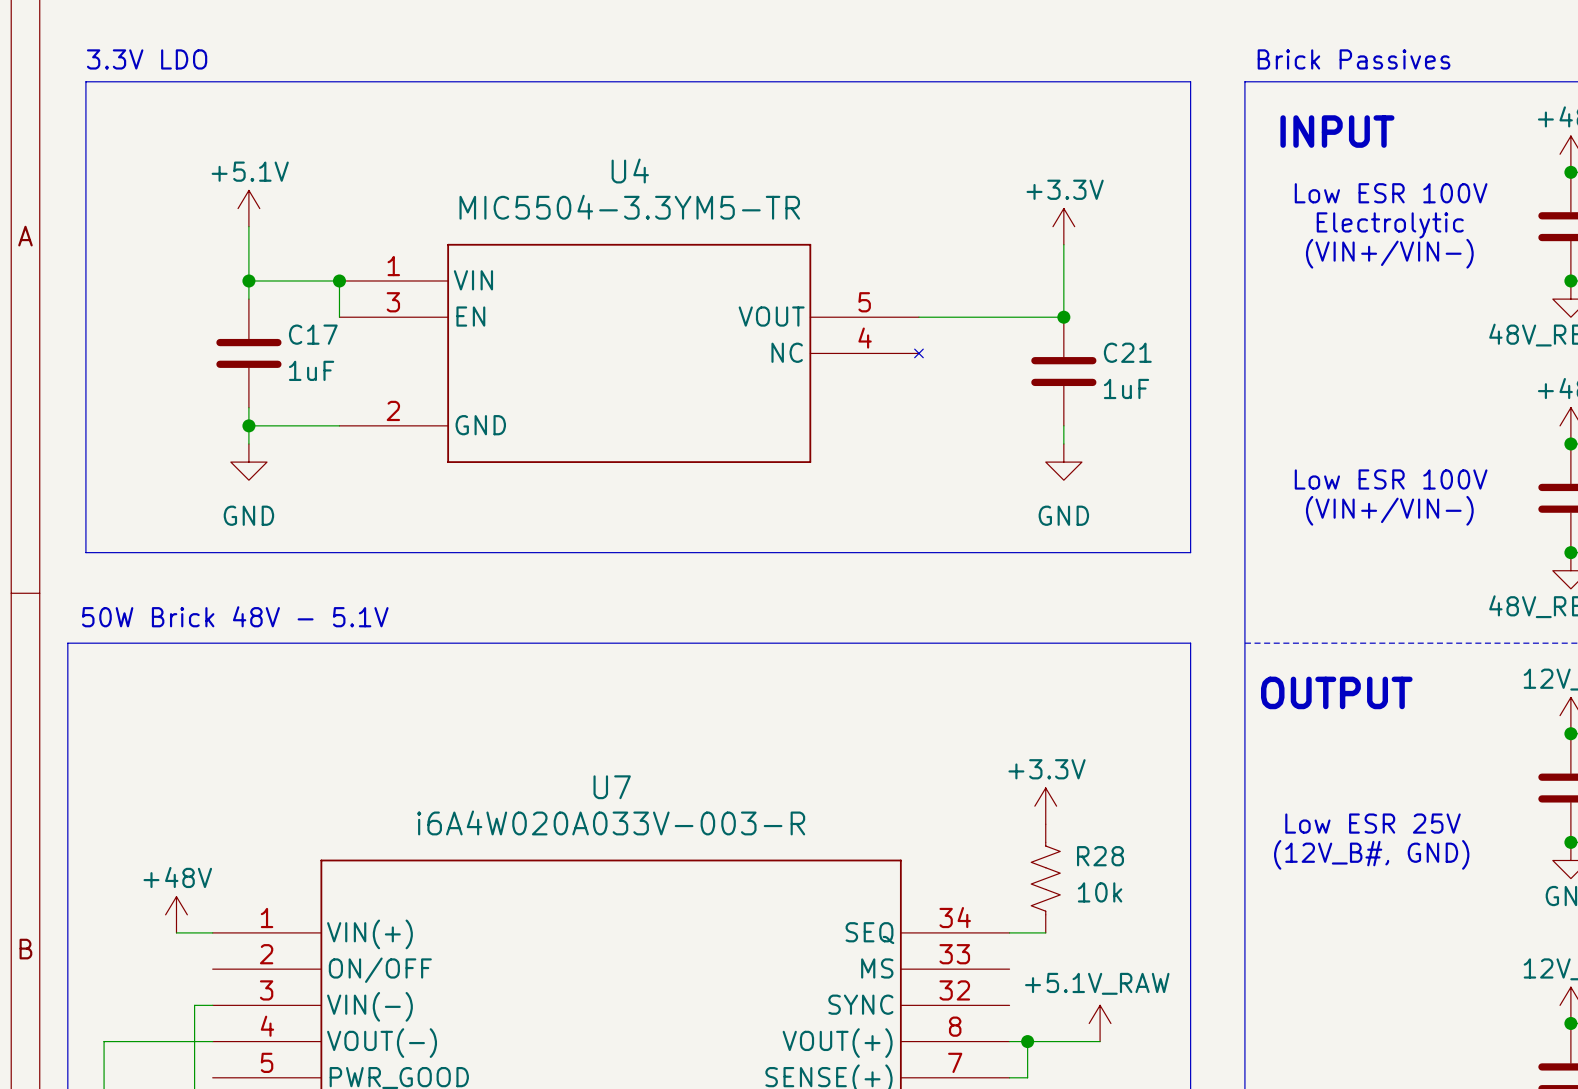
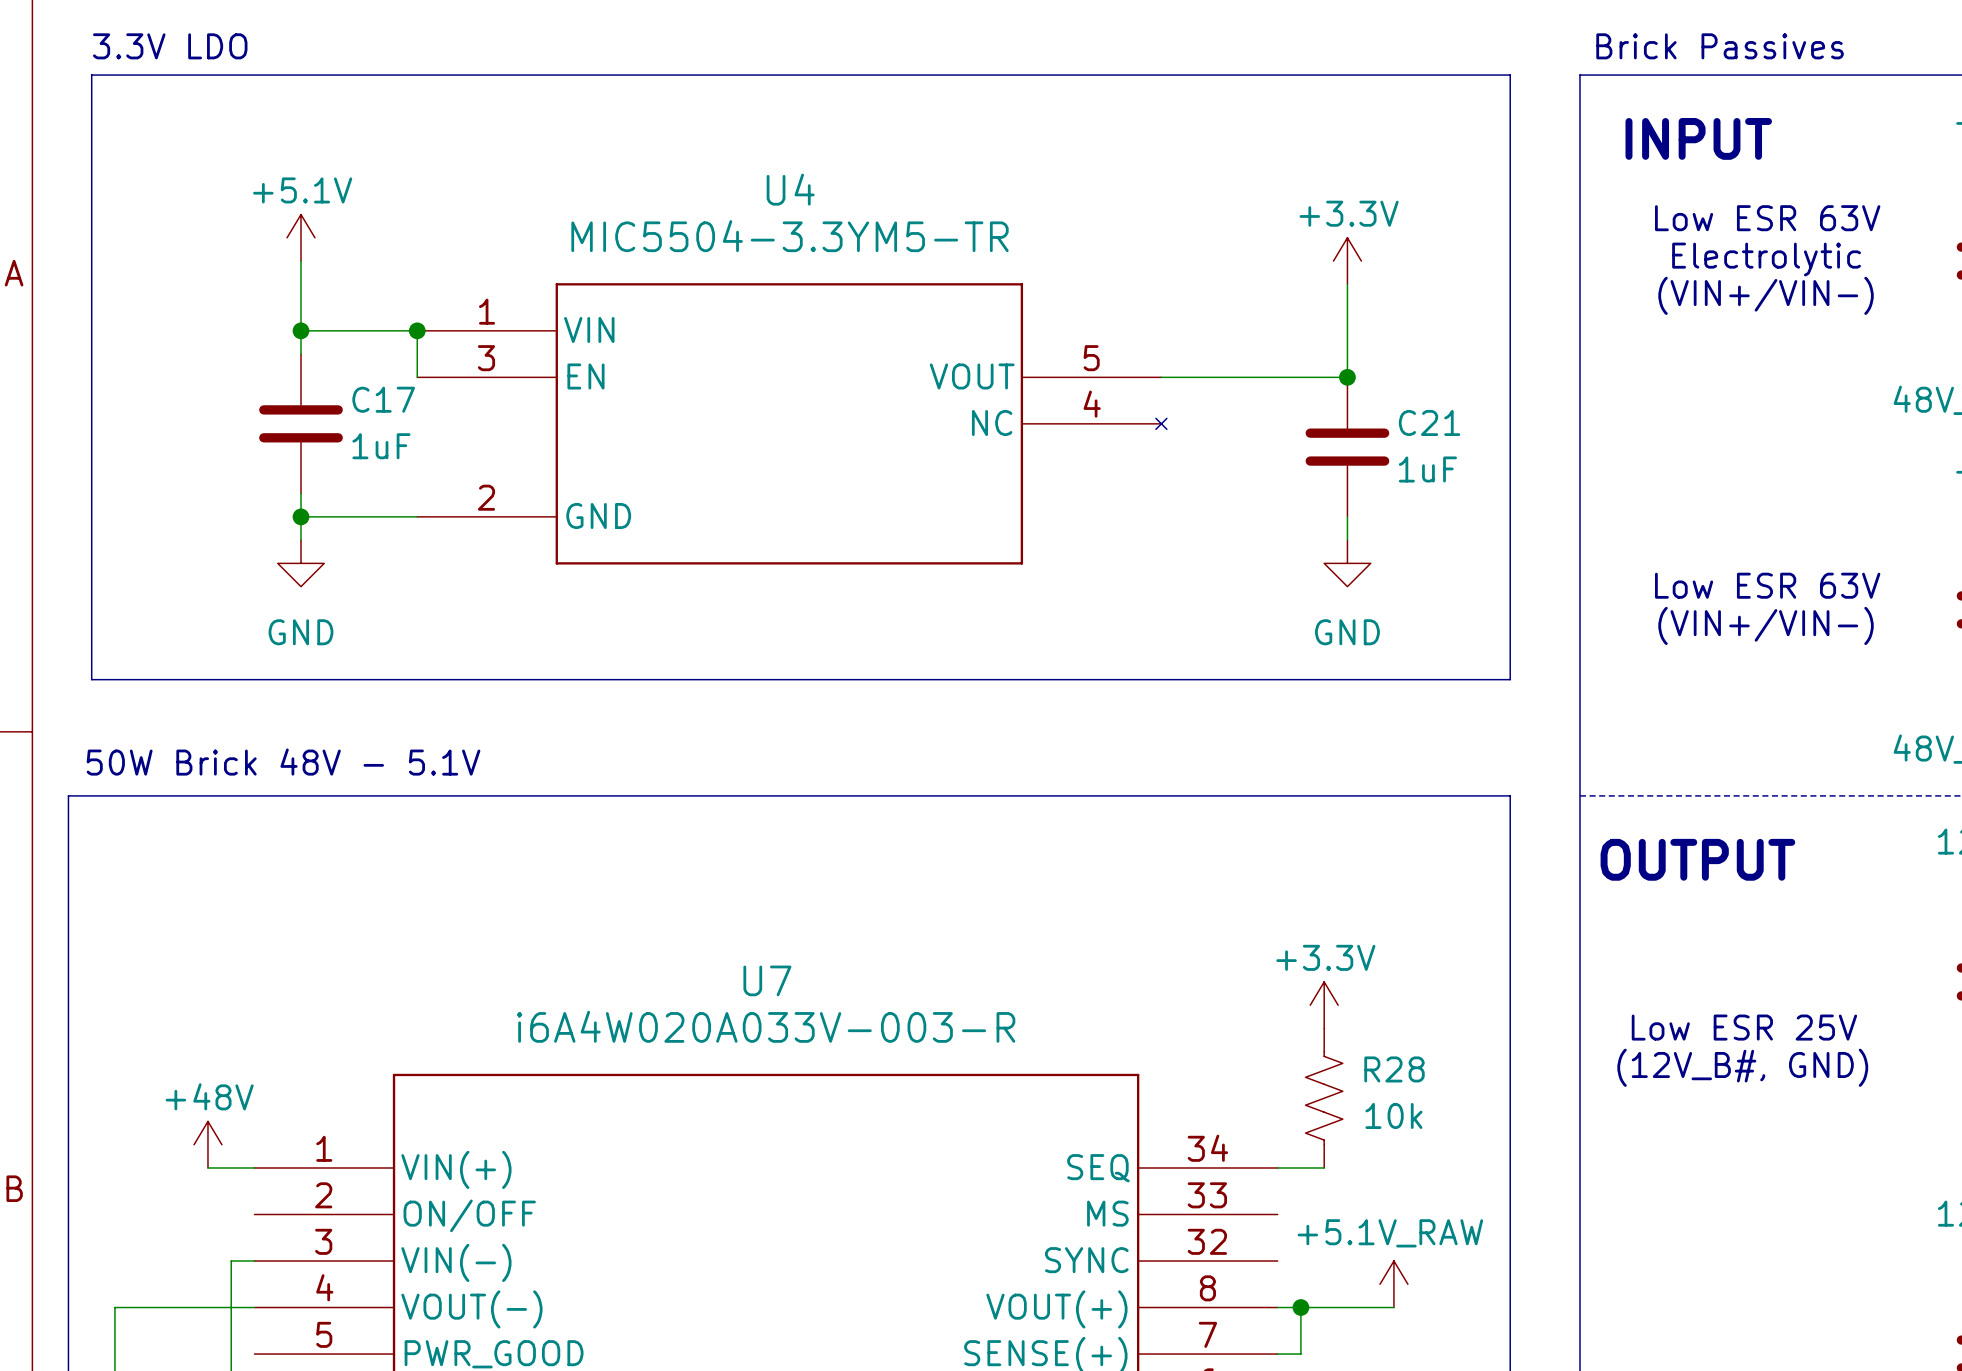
text: Low ESR 100V (1391, 193) -> Low ESR 63V (1767, 218)
text: Low ESR 100V (1391, 479) -> Low ESR 63V (1767, 585)

